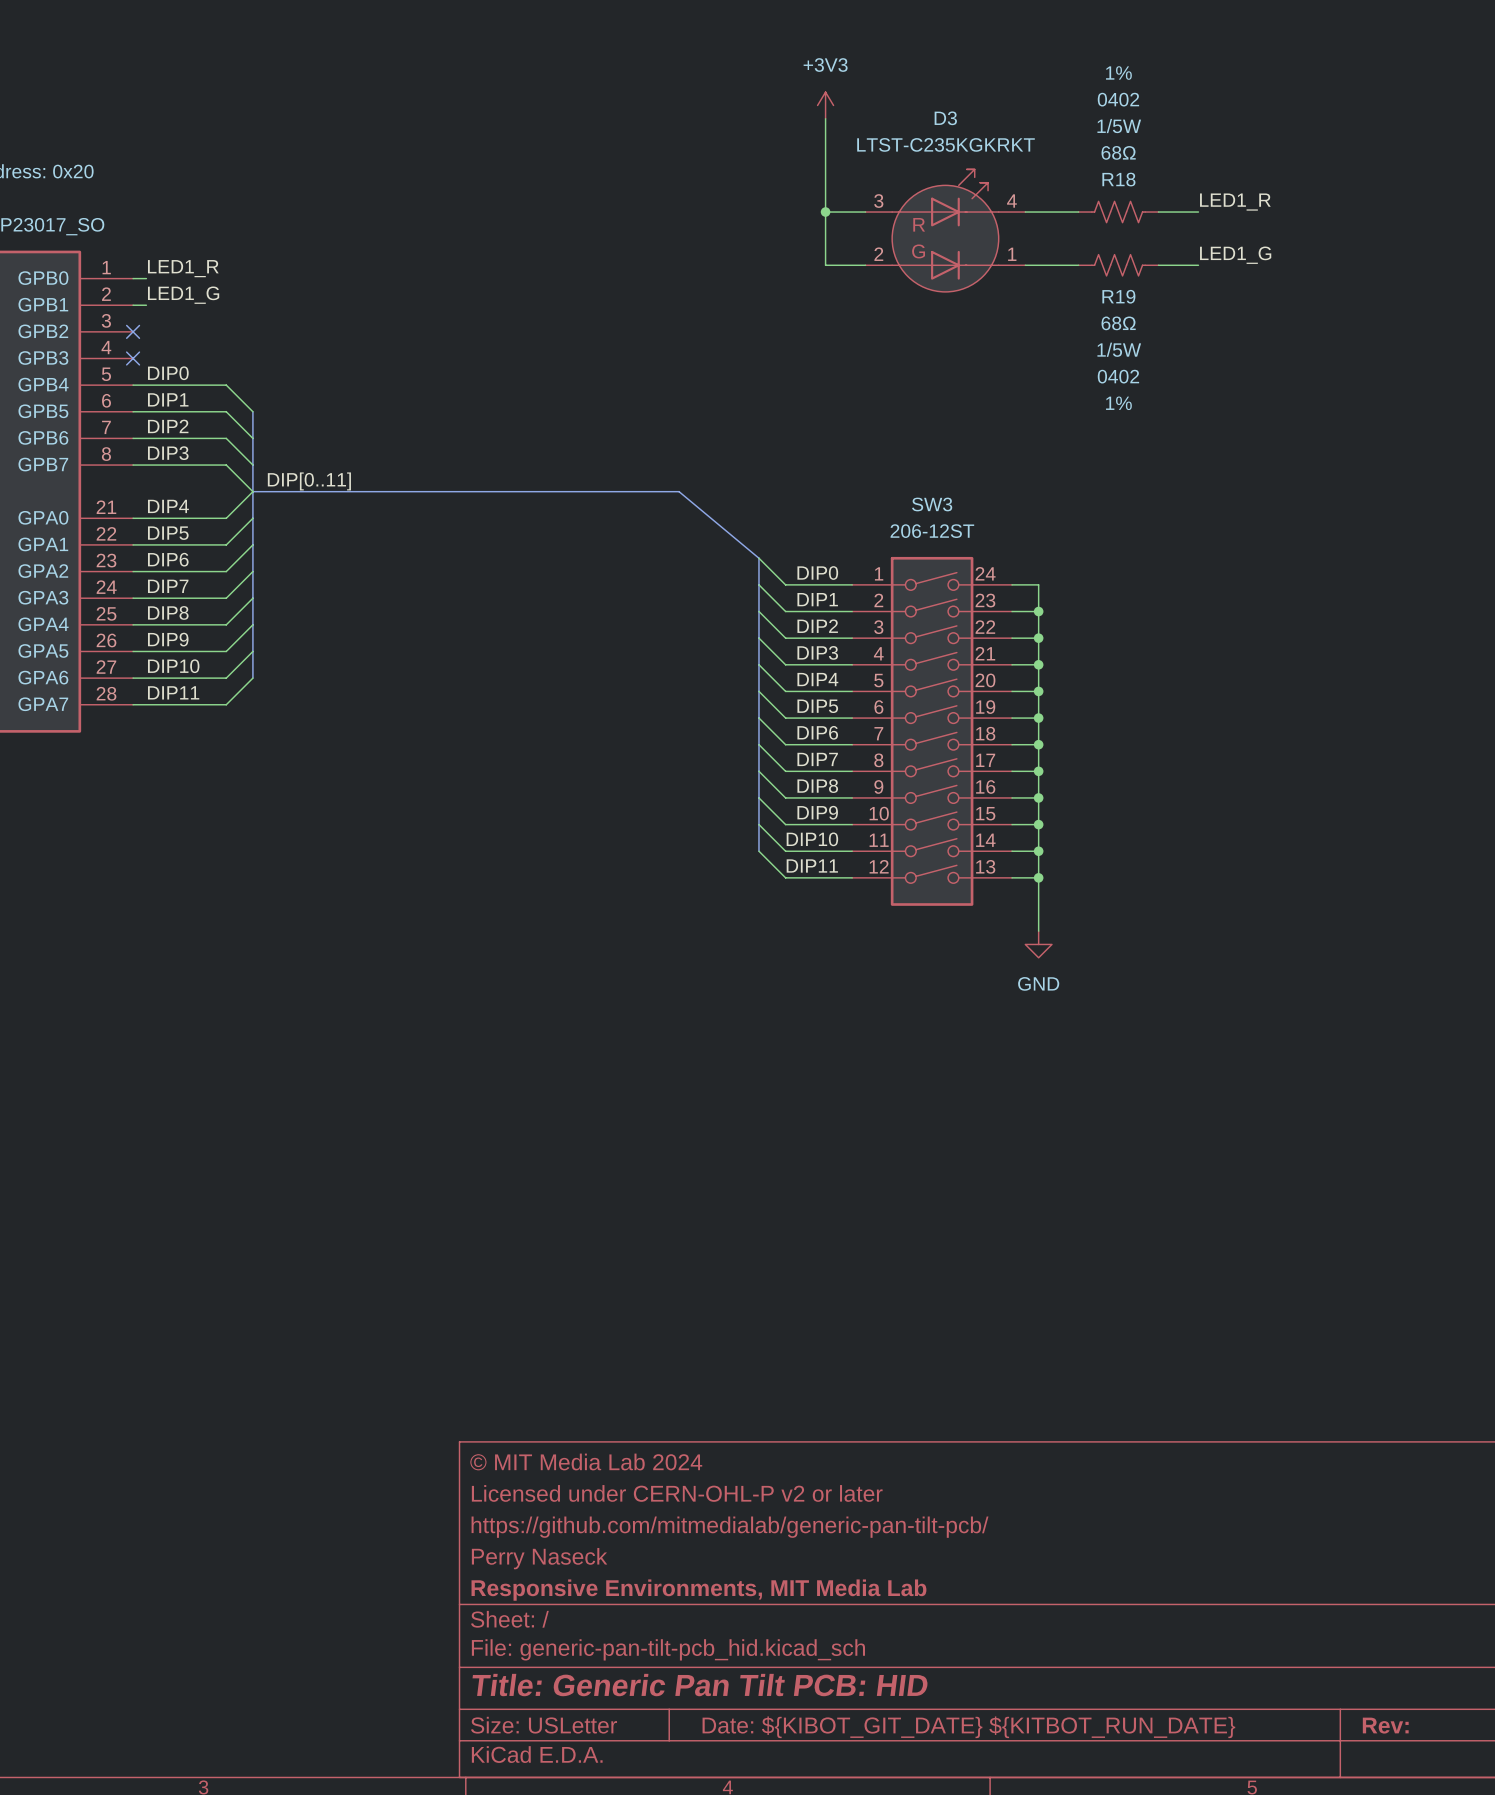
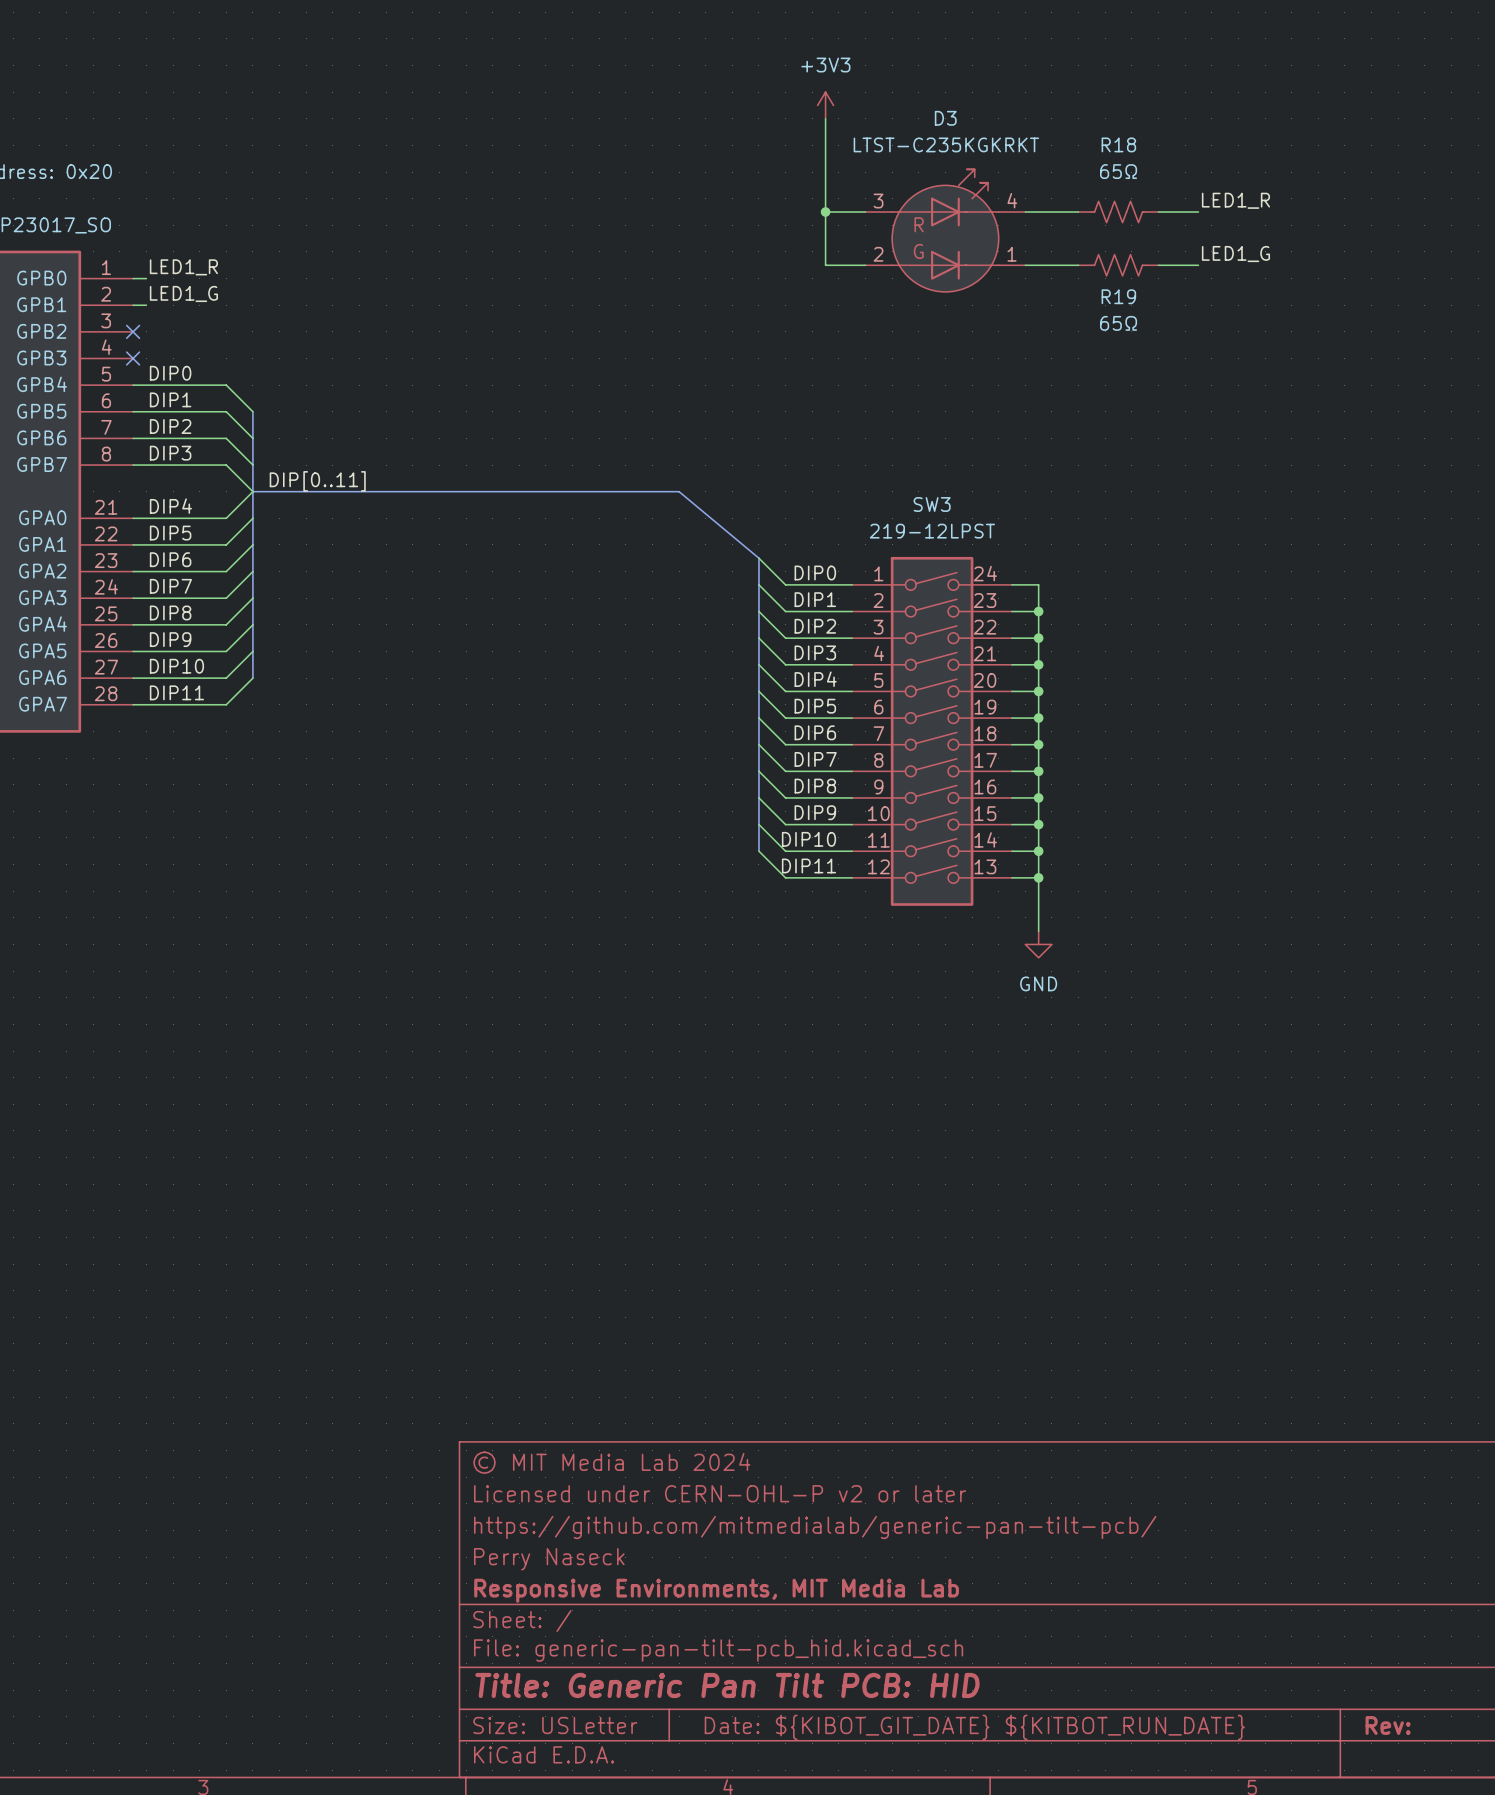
R18 text: 1% (1118, 73) -> none
R18 text: 0402 (1118, 99) -> none
R18 text: 1/5W (1119, 126) -> none
R18 value: 68Ω (1118, 152) -> 65Ω (1118, 171)
R18 name position: R18 (1118, 179) -> R18 (1118, 144)
R19 value: 68Ω (1118, 323) -> 65Ω (1118, 323)
R19 text: 1/5W (1119, 349) -> none
R19 text: 0402 (1118, 376) -> none
R19 text: 1% (1118, 403) -> none
SW3 value: 206-12ST (932, 531) -> 219-12LPST (932, 531)

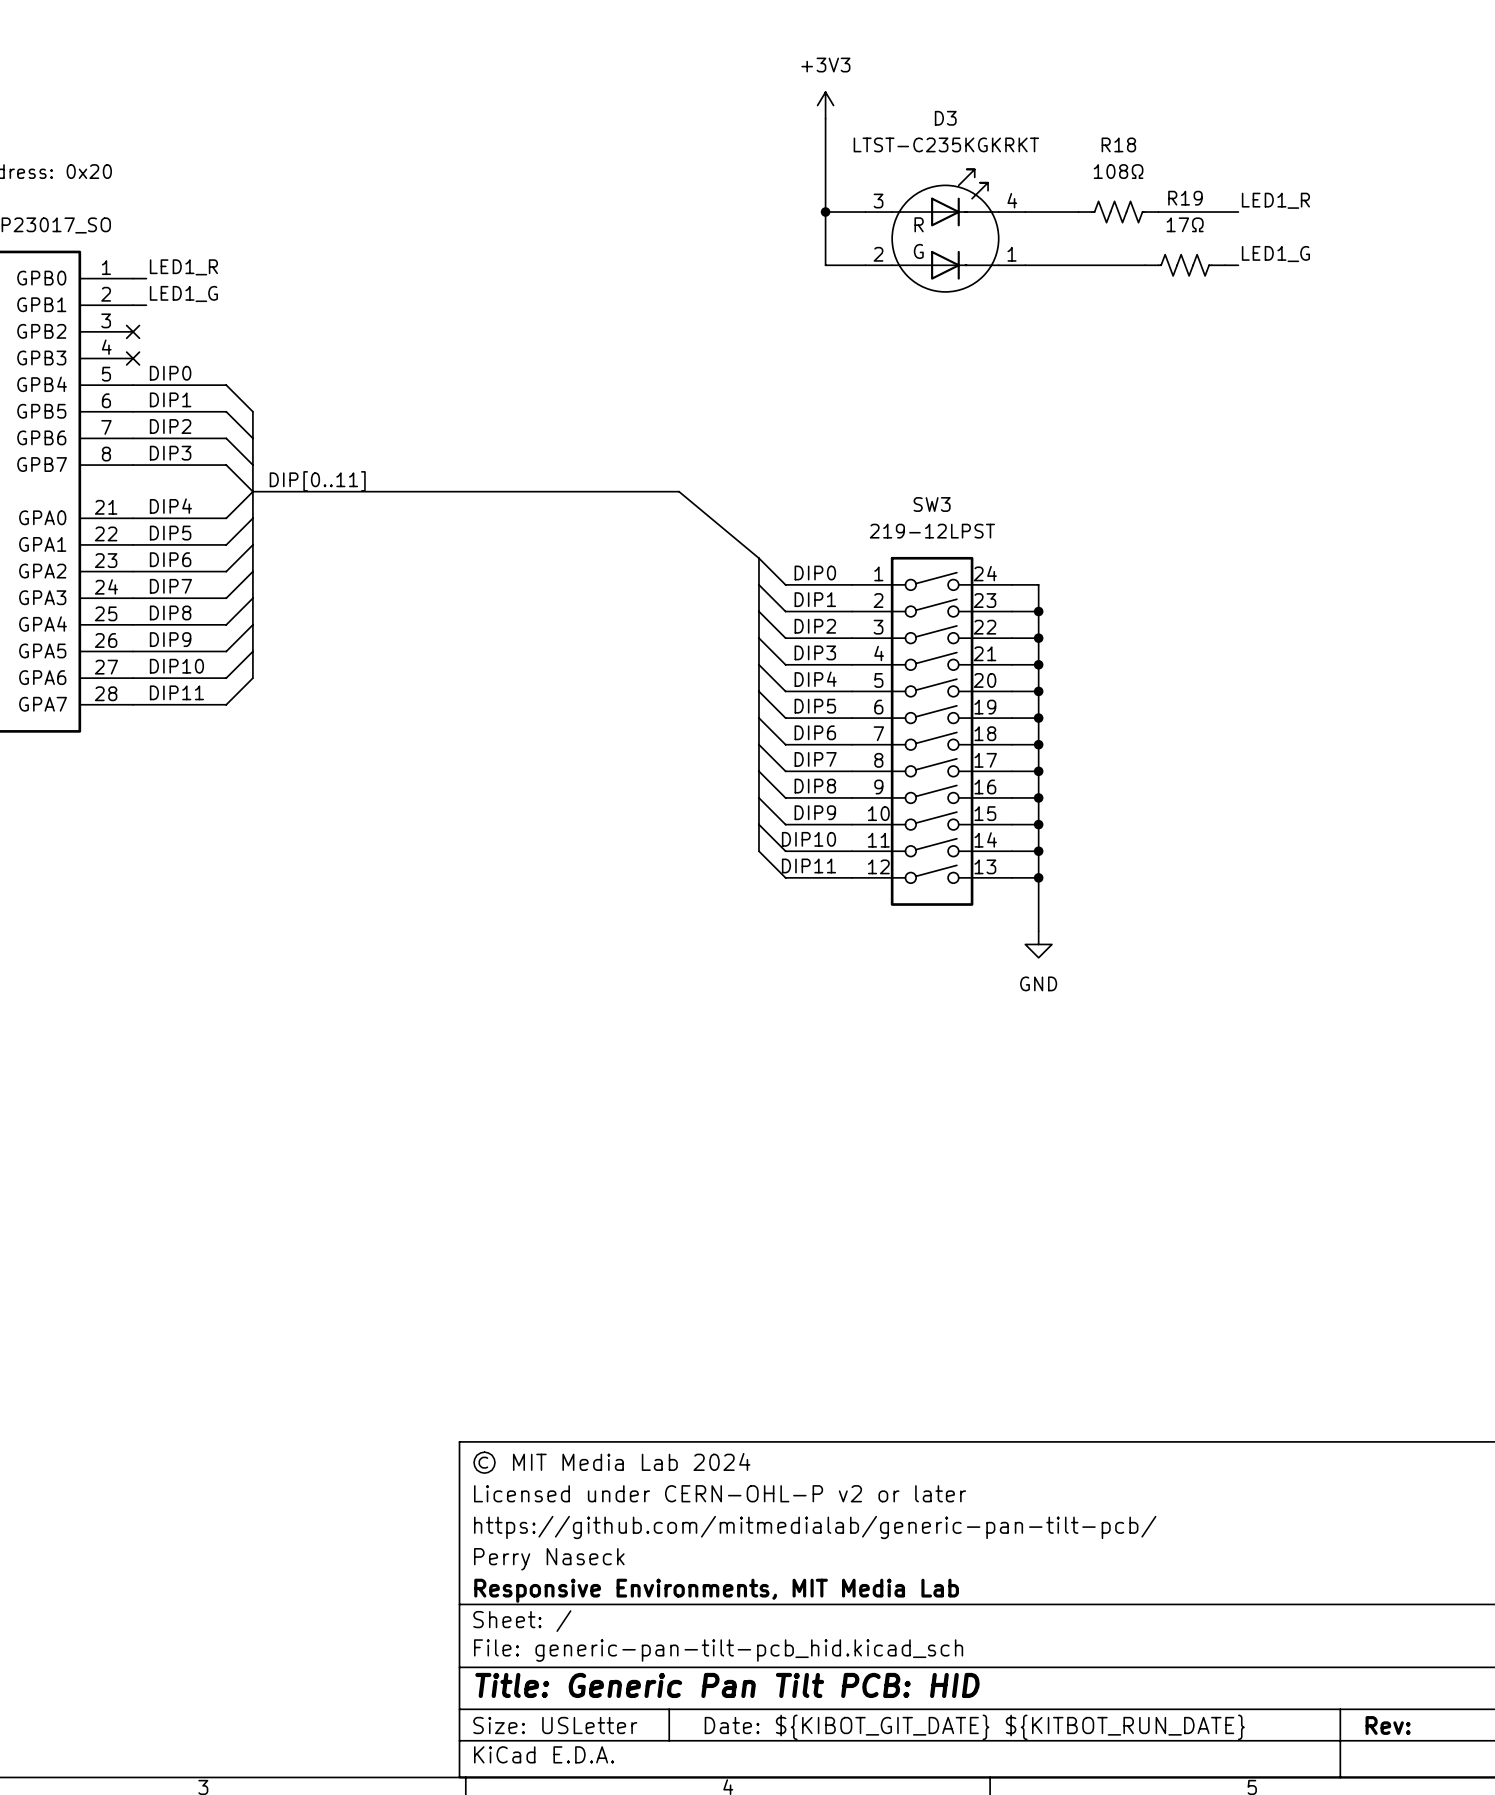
R18 value: 65Ω (1118, 171) -> 108Ω (1118, 171)
label position: LED1_R (1235, 200) -> LED1_R (1275, 200)
label position: LED1_G (1235, 254) -> LED1_G (1275, 254)
wire: none -> (1078, 265) (1145, 265)
R19 position: (1118, 265) -> (1185, 265)
wire: (1158, 265) (1198, 265) -> (1198, 212) (1238, 212)
wire: none -> (1225, 265) (1238, 265)
R19 name position: R19 (1118, 296) -> R19 (1185, 198)
R19 value: 65Ω (1118, 323) -> 17Ω (1185, 224)

